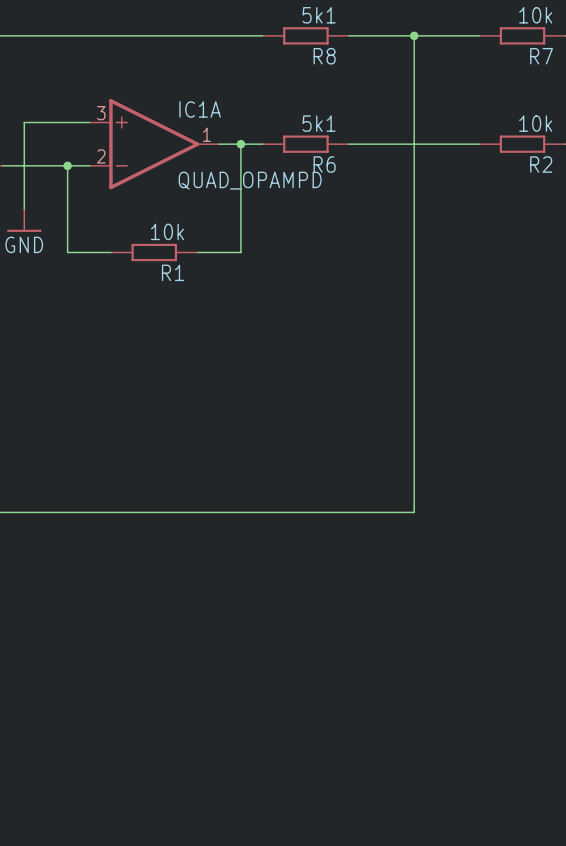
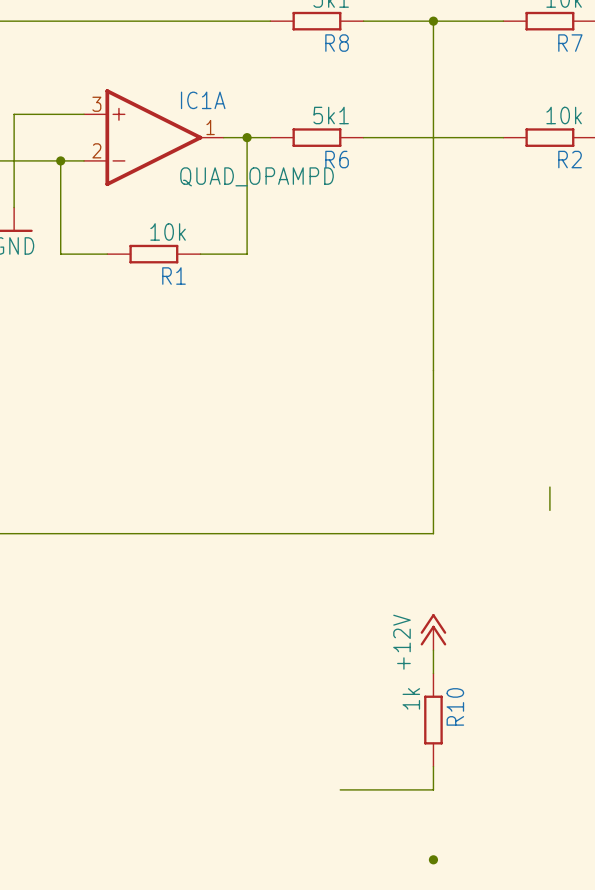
wire: none -> (549, 487) (549, 510)
power symbol: none -> +12V (433, 632)
wire: none -> (433, 650) (433, 673)
R10: none -> 1k (433, 720)
wire: none -> (433, 766) (433, 789) (340, 789)
junction: none -> (433, 859)

